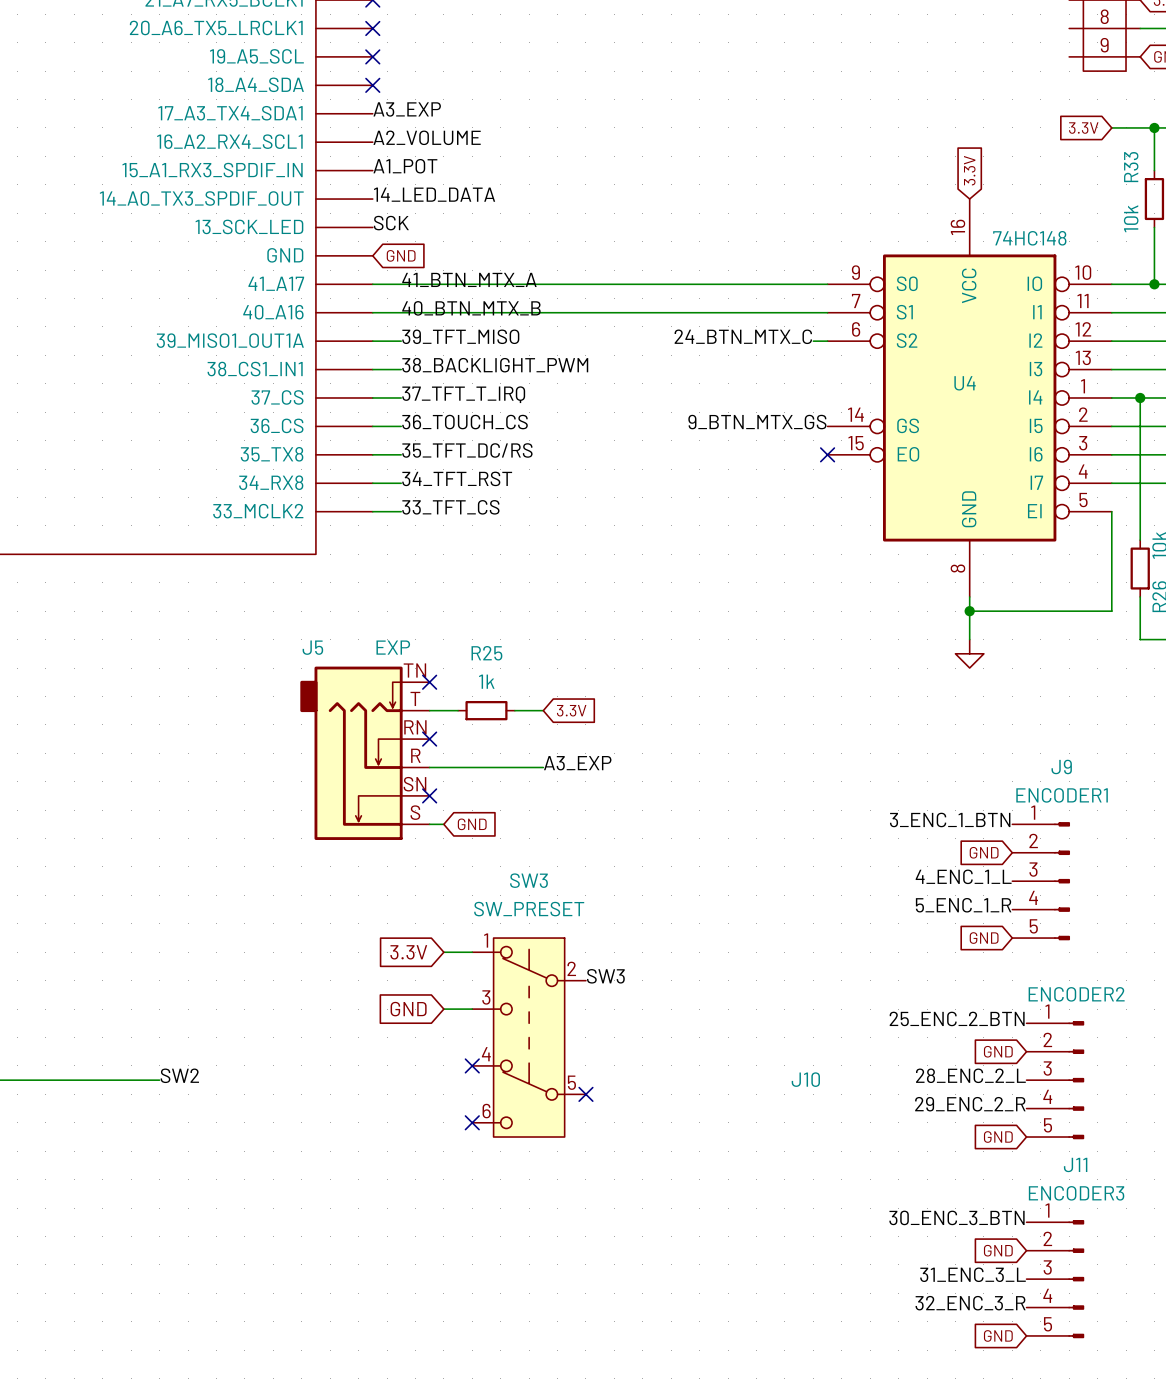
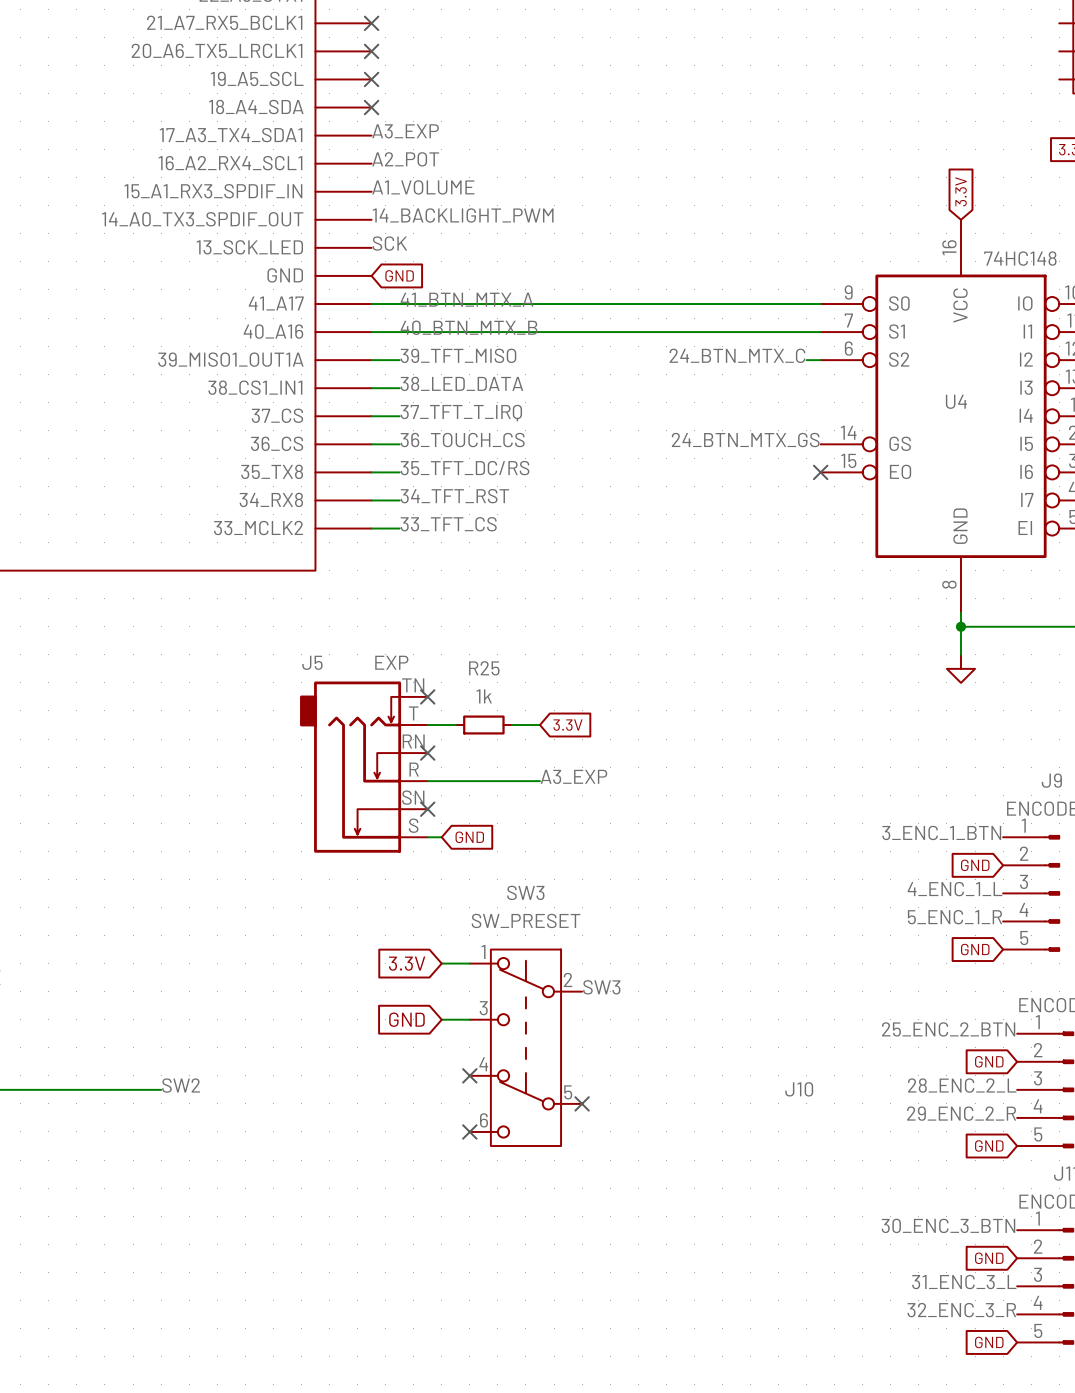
label: A2_VOLUME (427, 137) -> A2_POT (405, 159)
label: A1_POT (405, 166) -> A1_VOLUME (423, 187)
label: 14_LED_DATA (434, 194) -> 14_BACKLIGHT_PWM (463, 215)
label: 38_BACKLIGHT_PWM (495, 365) -> 38_LED_DATA (461, 383)
label: 9_BTN_MTX_GS (757, 422) -> 24_BTN_MTX_GS (745, 440)

